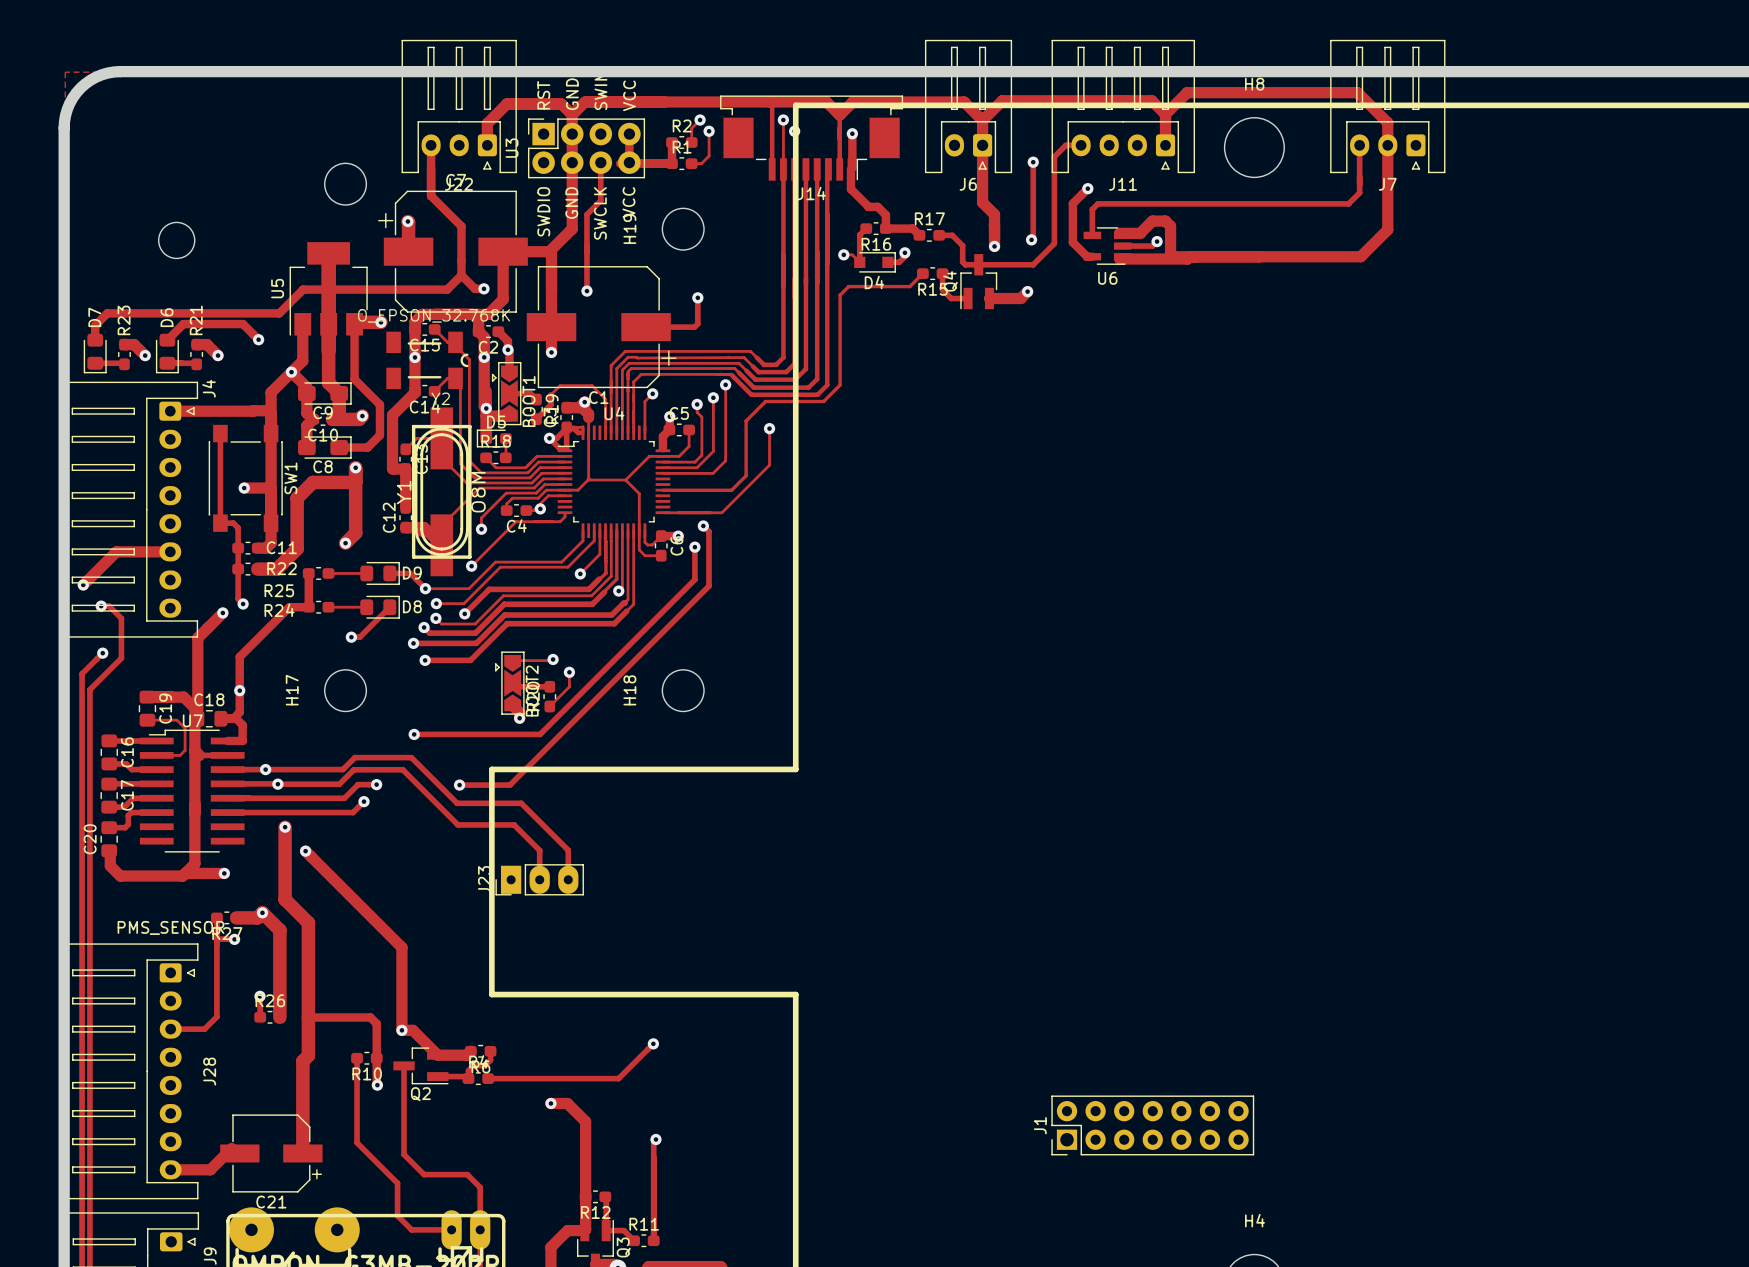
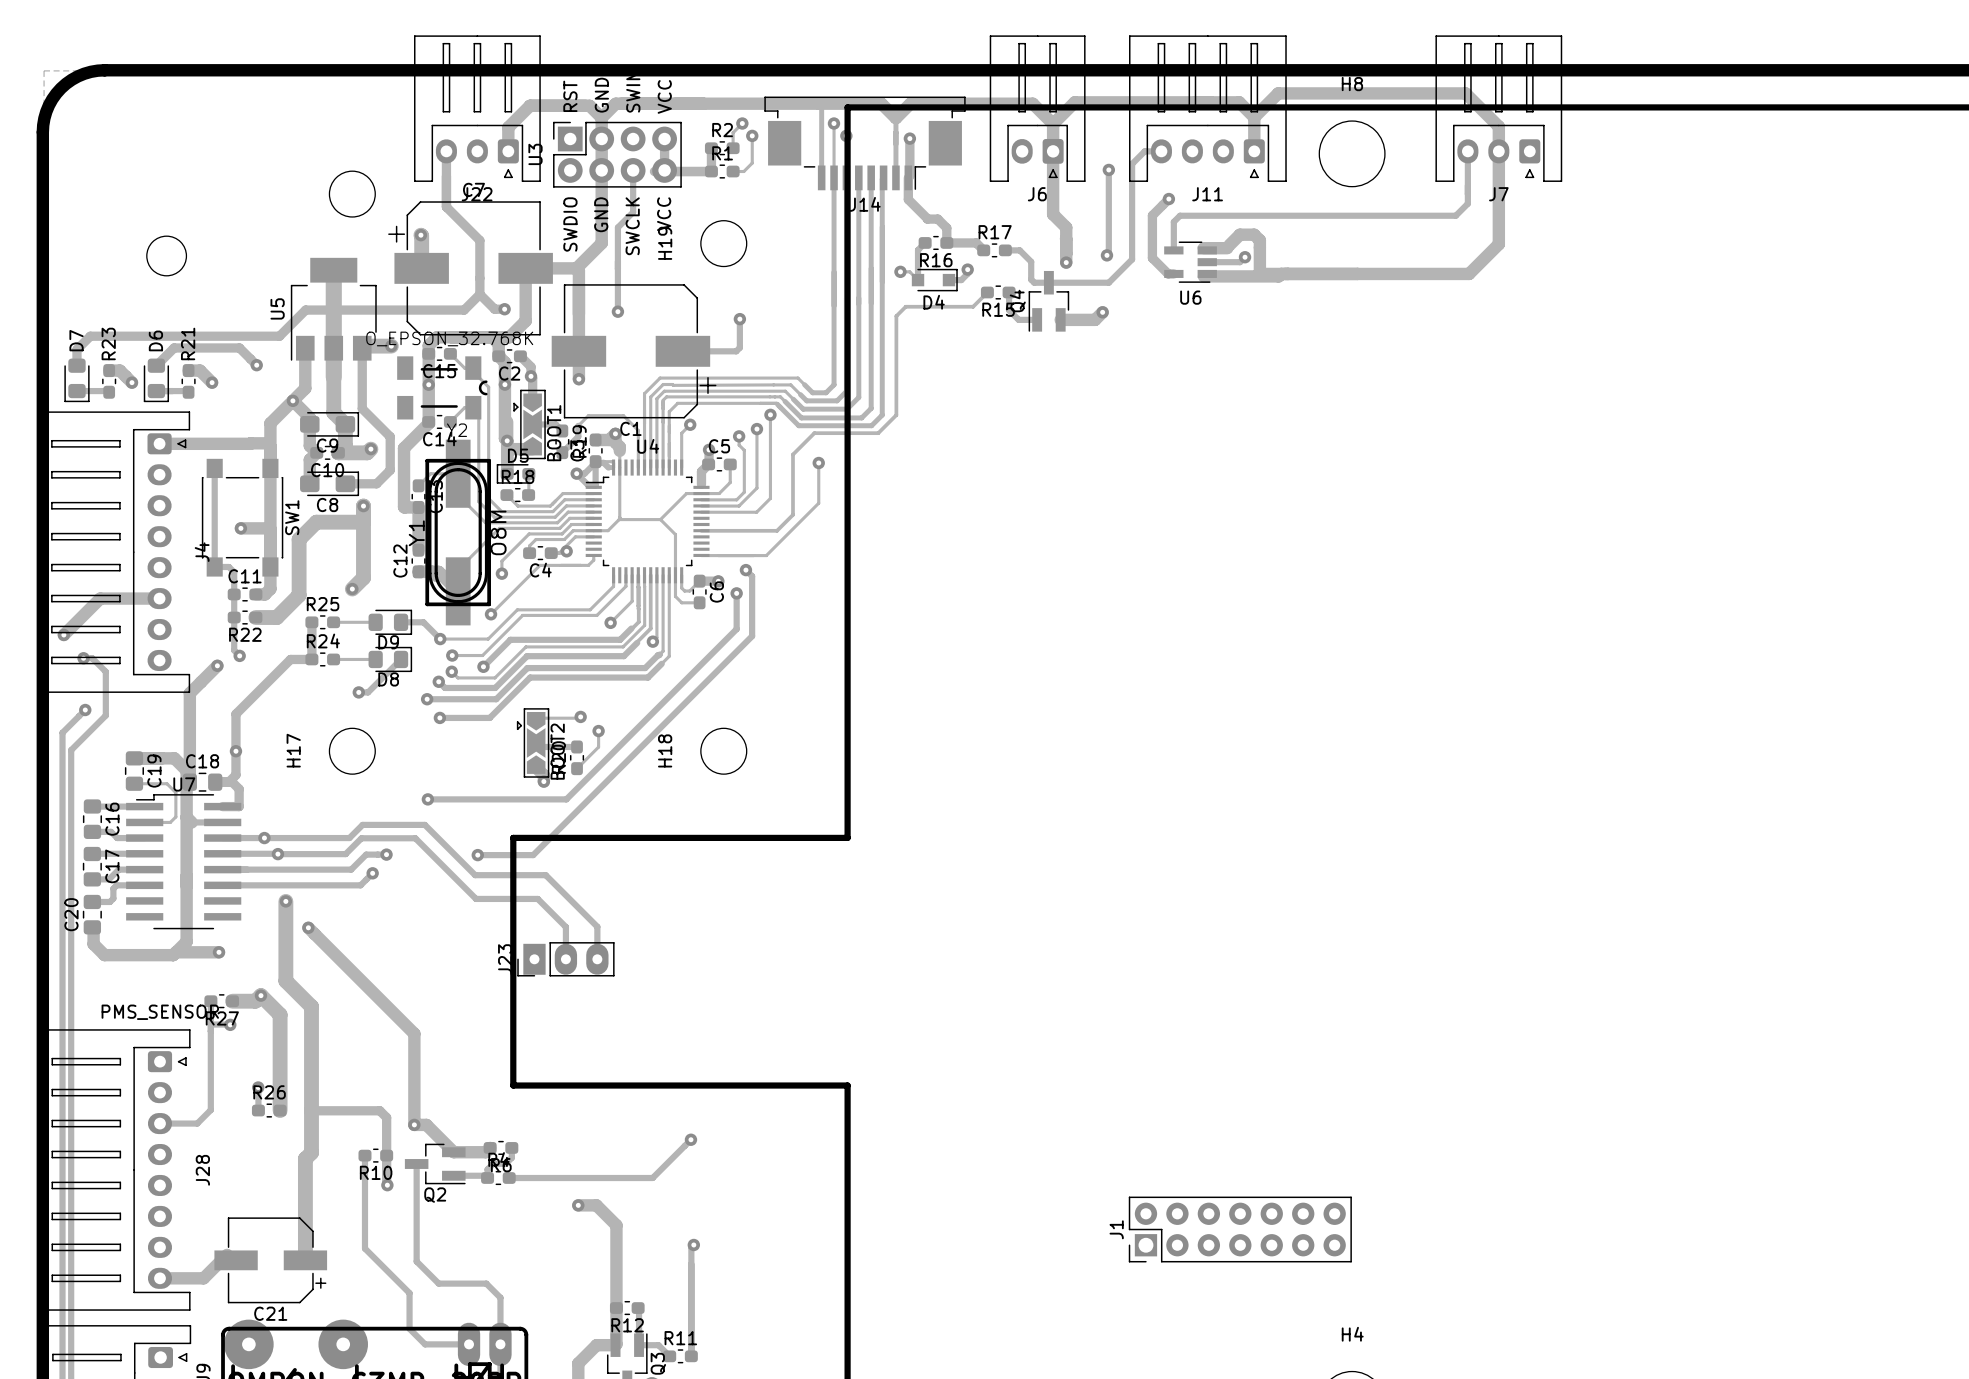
J4 name position: J4 (209, 388) -> J4 (202, 552)
C11 name position: C11 (281, 547) -> C11 (245, 576)
R22 name position: R22 (282, 568) -> R22 (245, 634)
D9 name position: D9 (412, 573) -> D9 (388, 642)
R25 name position: R25 (279, 590) -> R25 (323, 604)
D8 name position: D8 (412, 606) -> D8 (388, 679)
R24 name position: R24 (279, 610) -> R24 (323, 640)

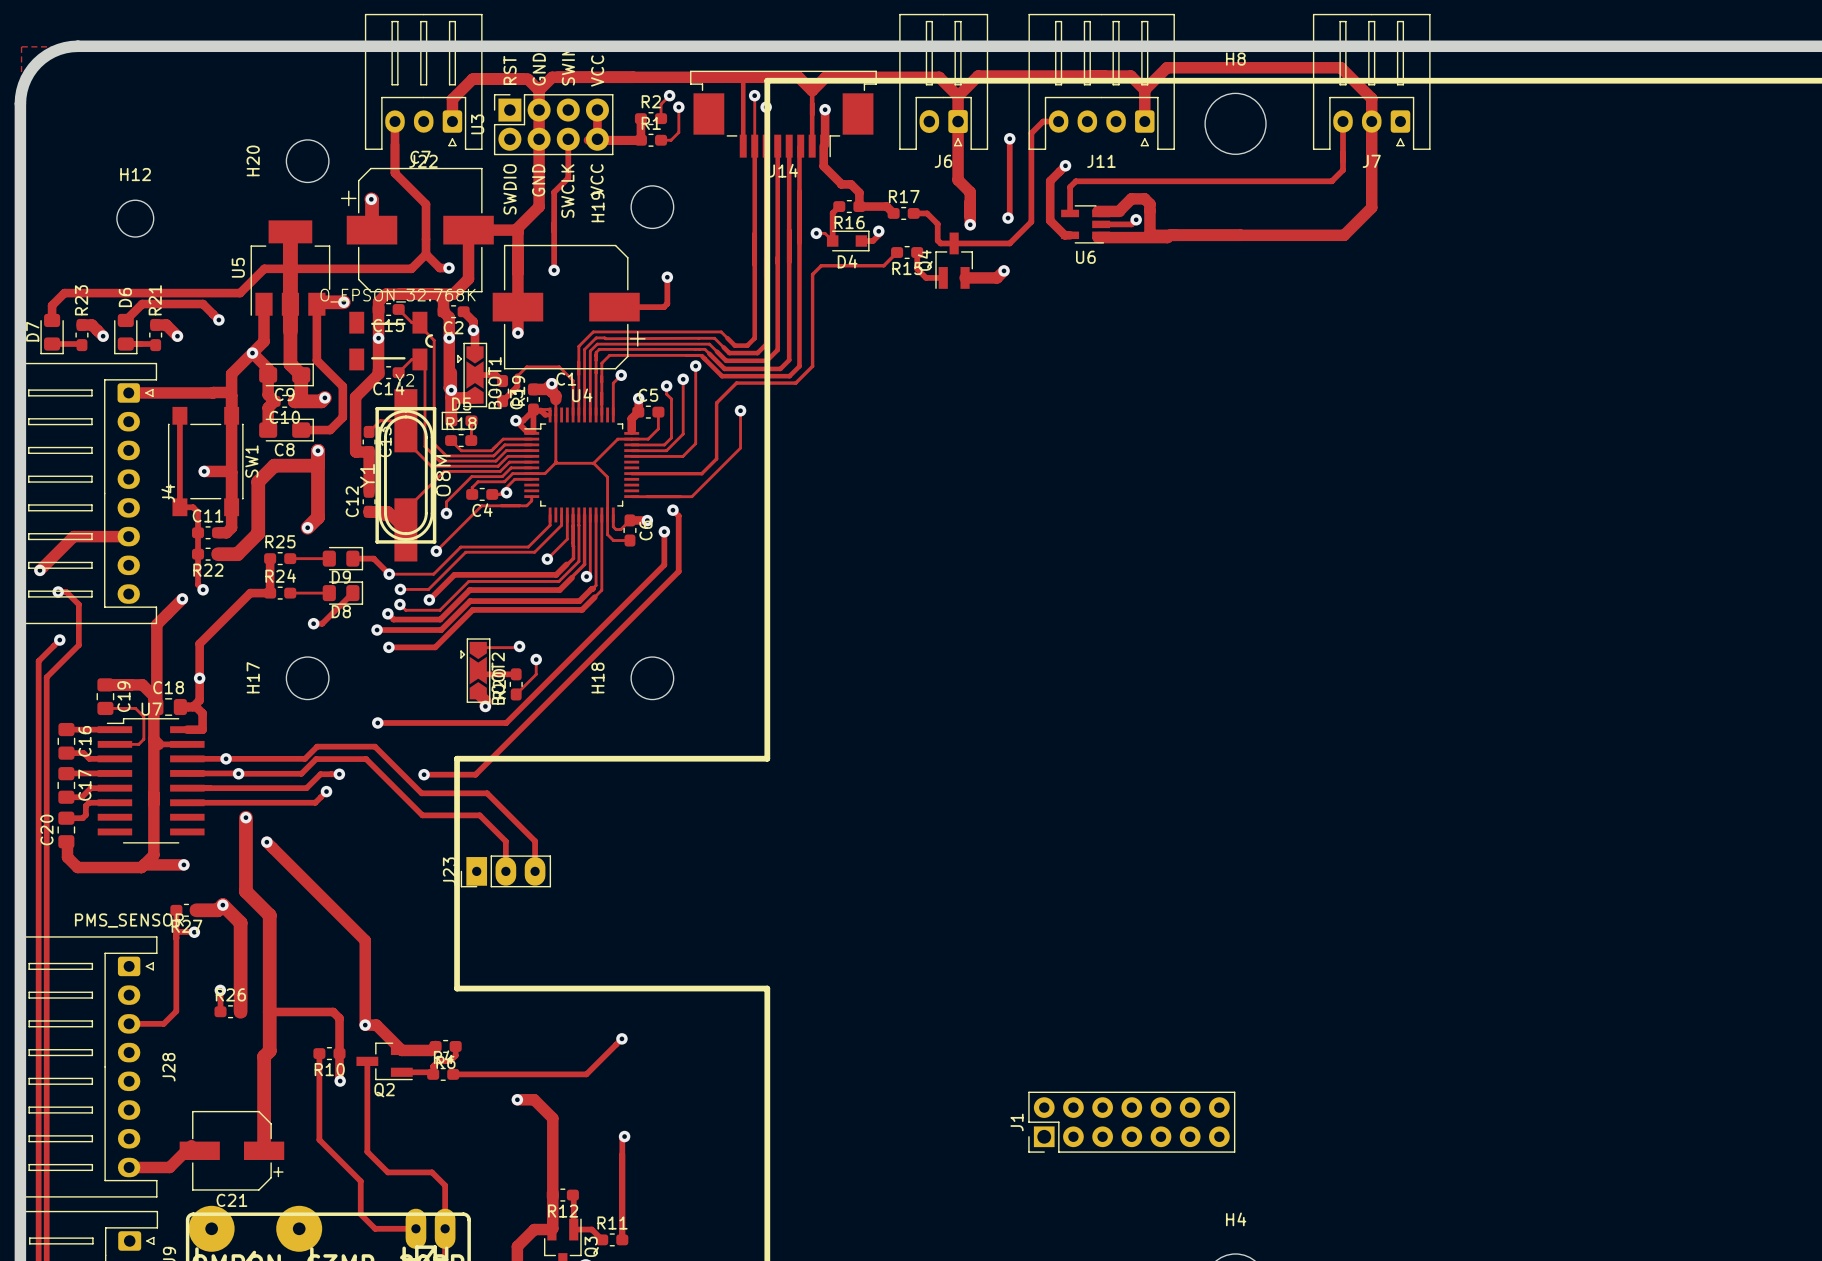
H20 name: none -> H20 (253, 160)
H12 name: none -> H12 (135, 174)
D7 name position: D7 (76, 340) -> D7 (32, 331)

